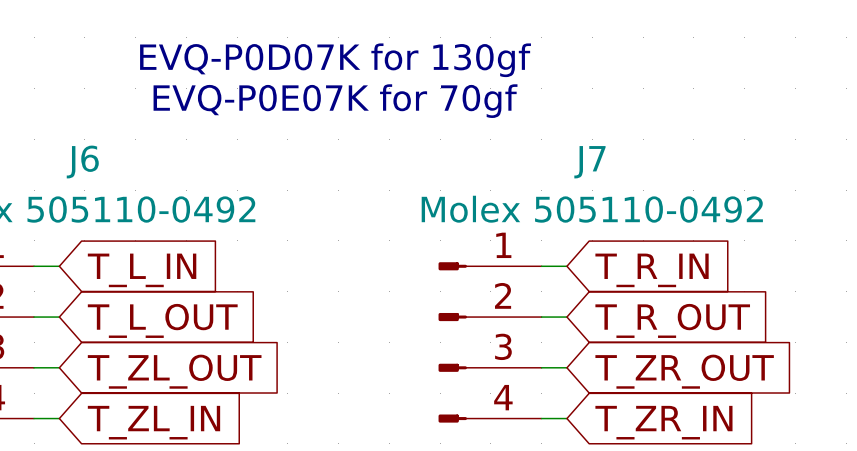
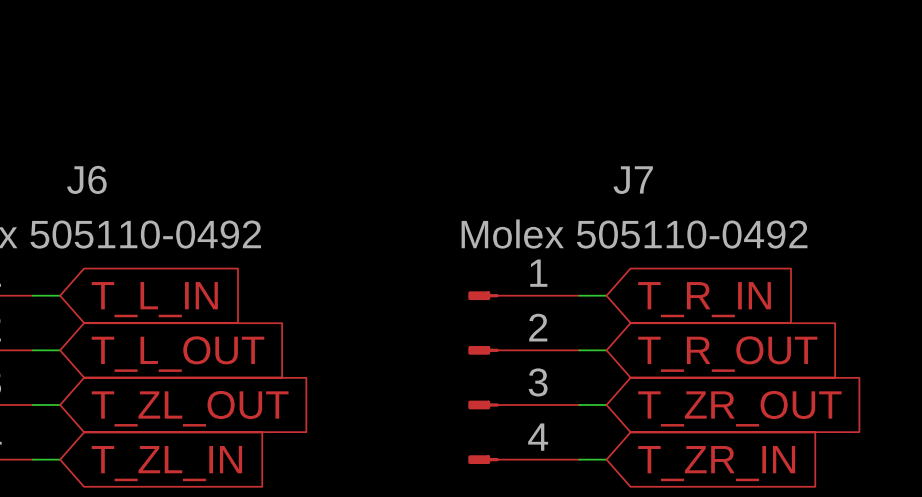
text: EVQ-P0D07K for 130gf (335, 60) -> none
text: EVQ-P0E07K for 70gf (335, 101) -> none

